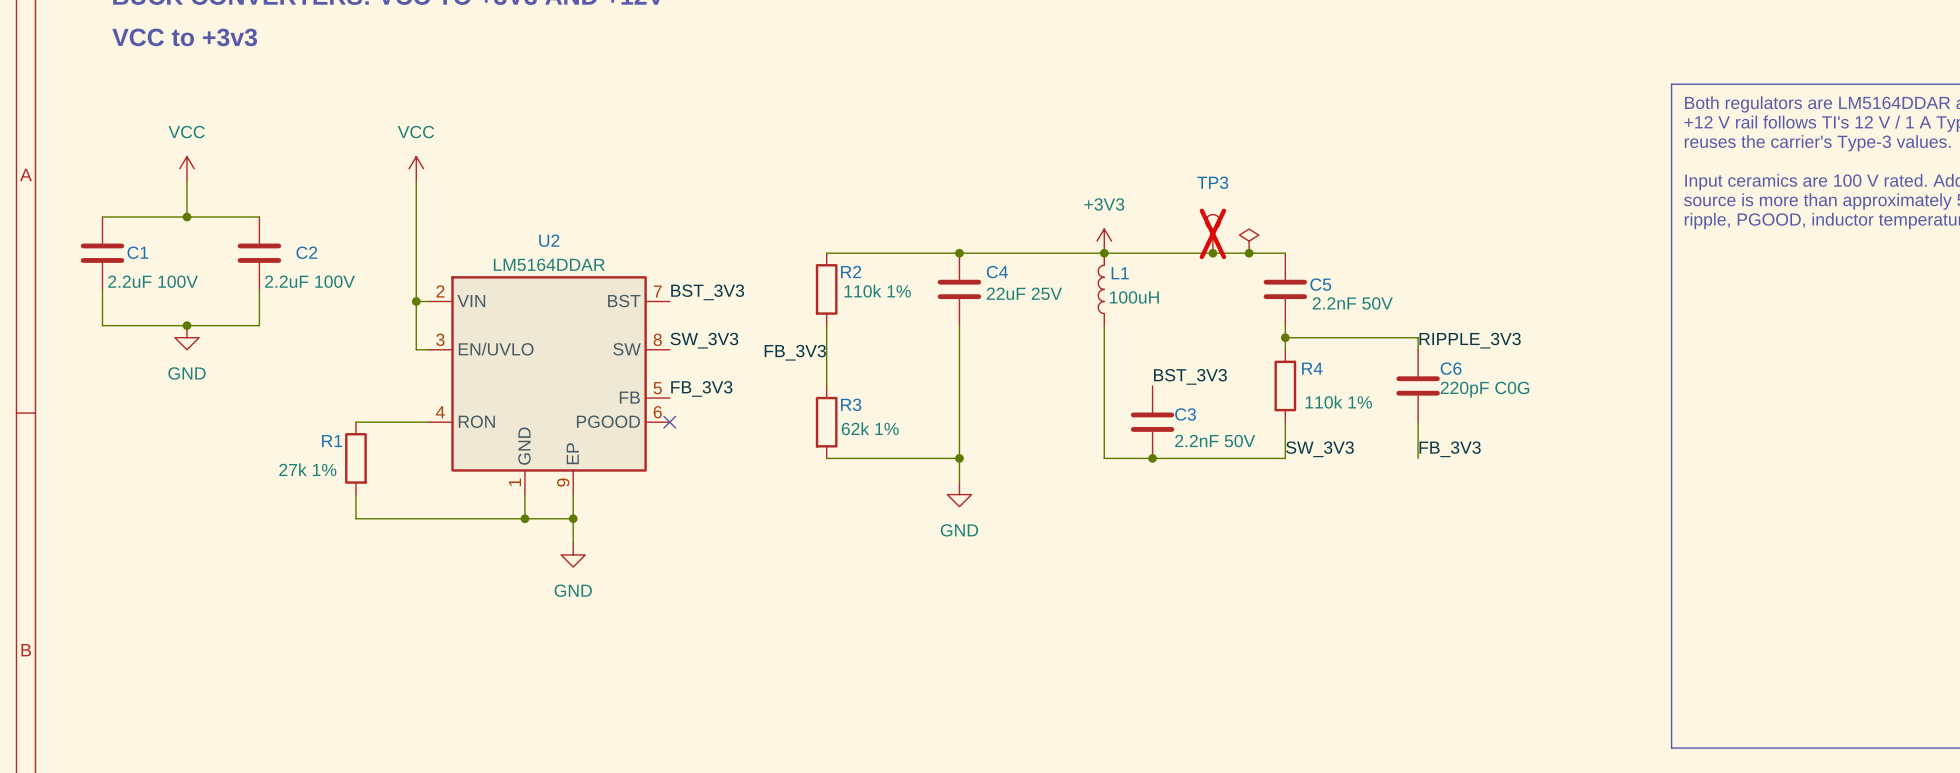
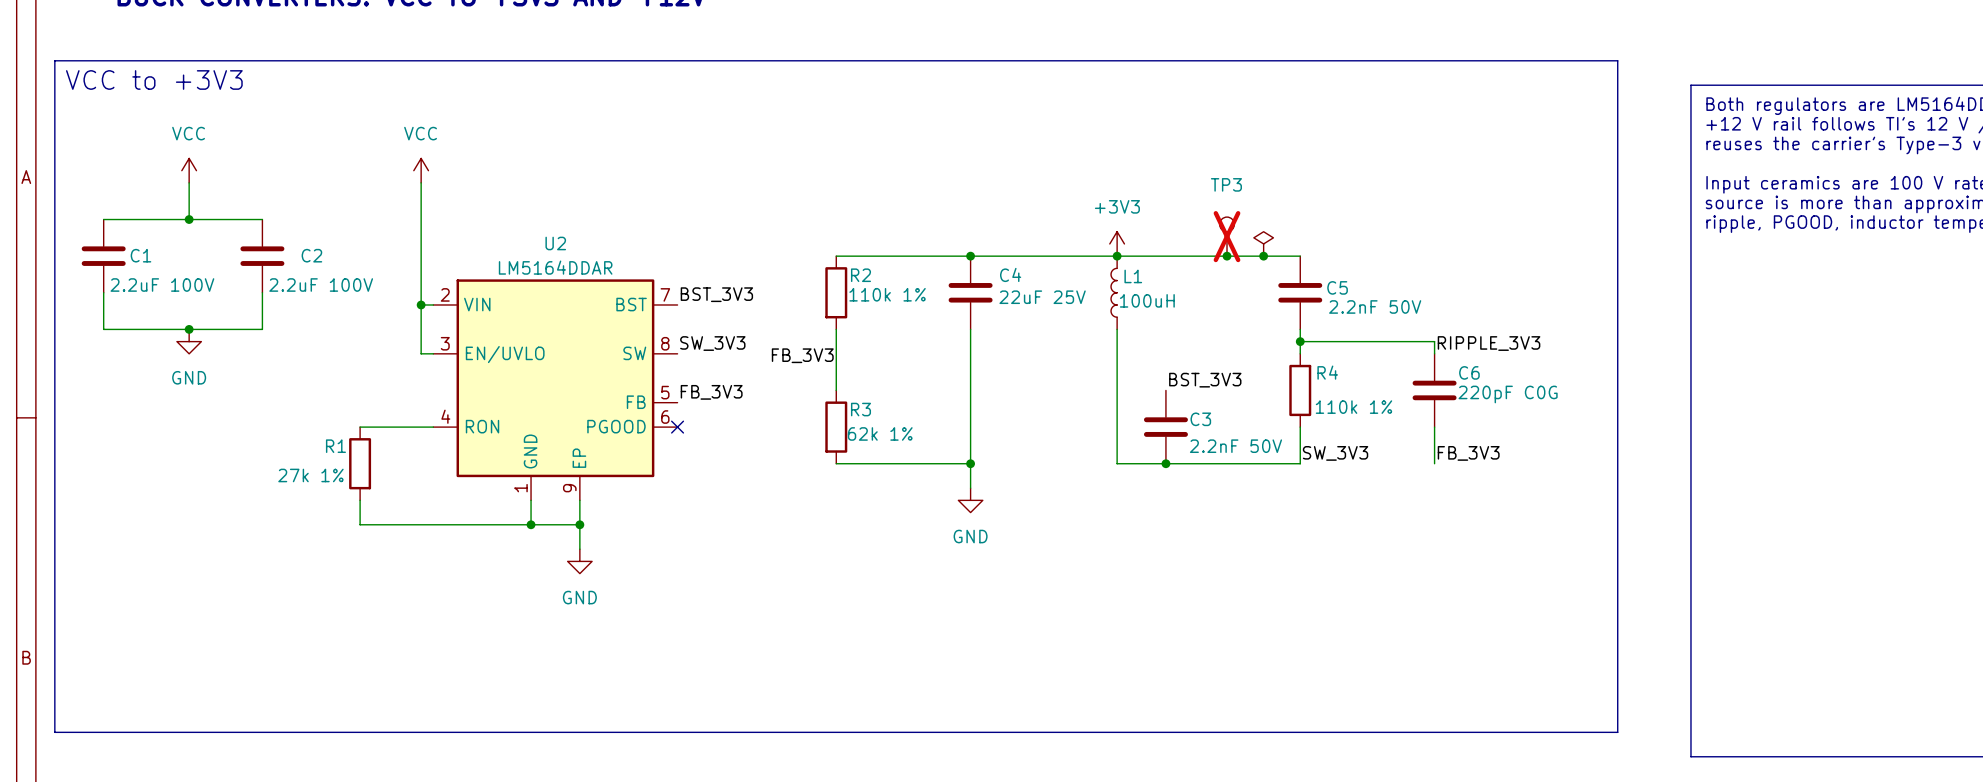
text: VCC to +3v3 (184, 37) -> none
line: none -> (54, 60) (1617, 60) (1617, 732) (54, 732) (54, 60)
text: none -> VCC to +3V3 (154, 79)

